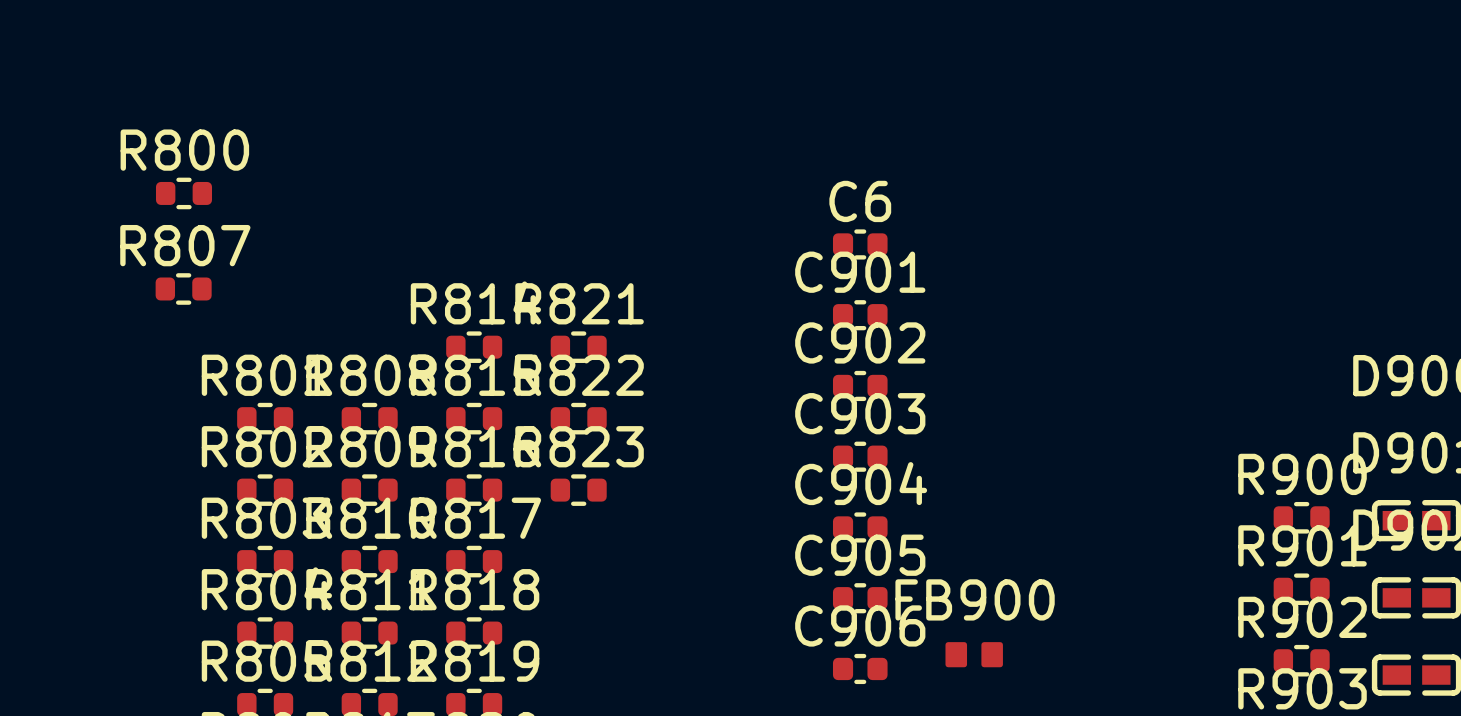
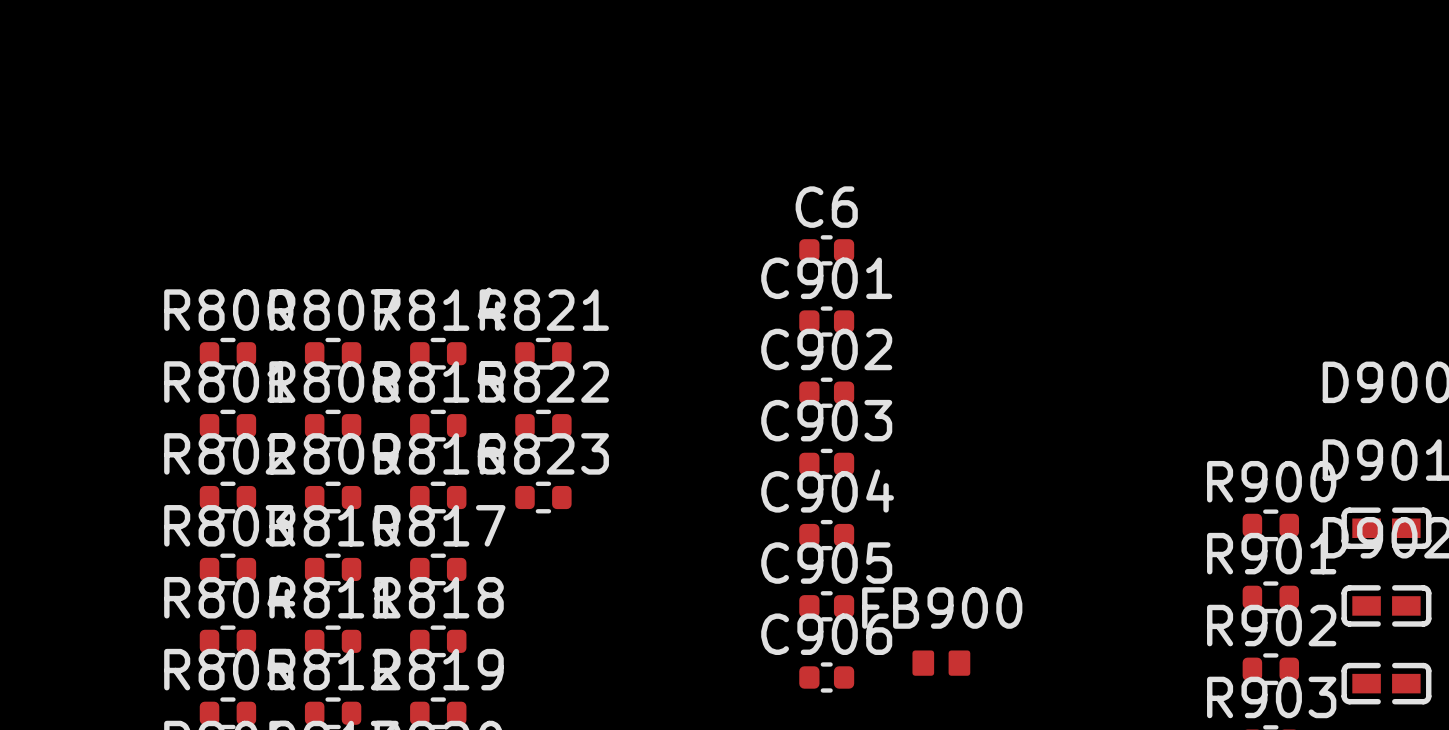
R800 position: (183, 193) -> (227, 353)
R807 position: (183, 288) -> (333, 353)

